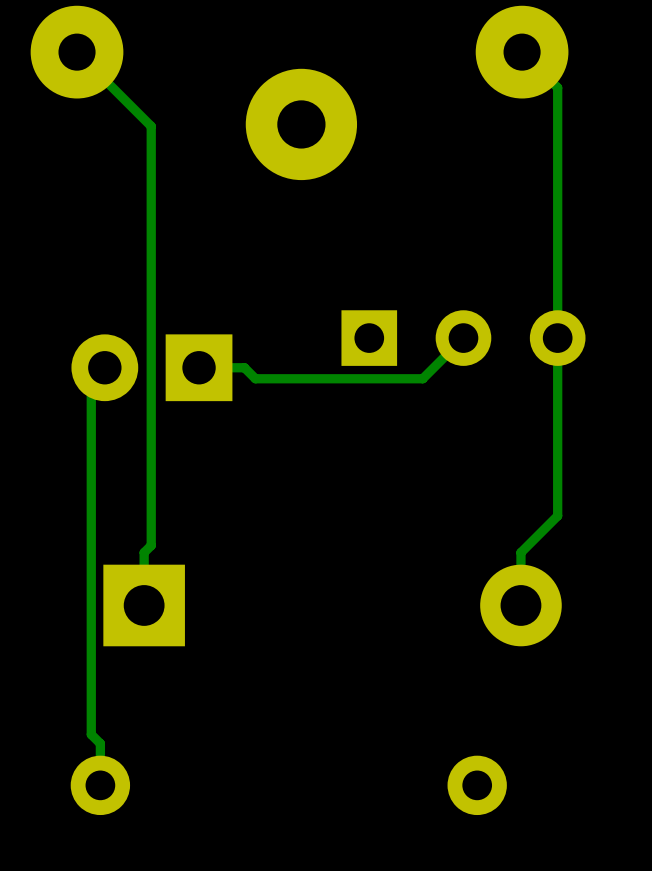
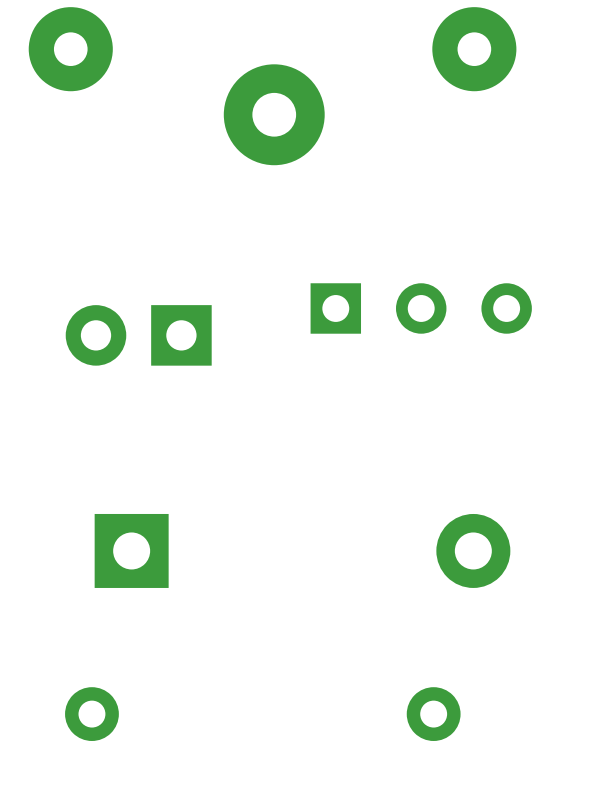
track: (77, 52) (151, 126) (151, 545) (144, 552) (144, 605) -> none
track: (522, 52) (557, 87) (557, 515) (520, 552) (520, 605) -> none
track: (463, 338) (422, 378) (255, 378) (244, 367) (199, 367) -> none
track: (104, 367) (91, 381) (91, 734) (100, 743) (100, 785) -> none

